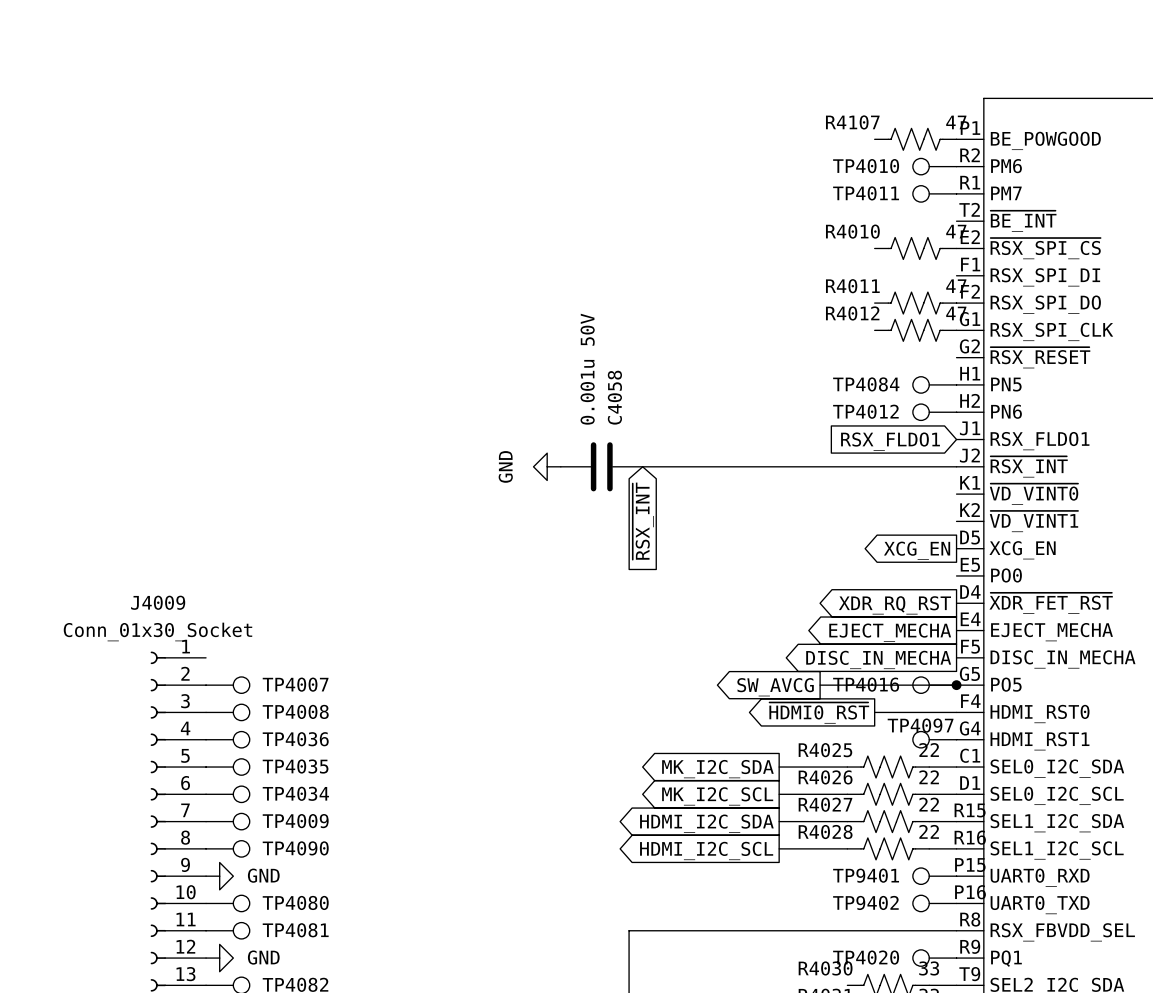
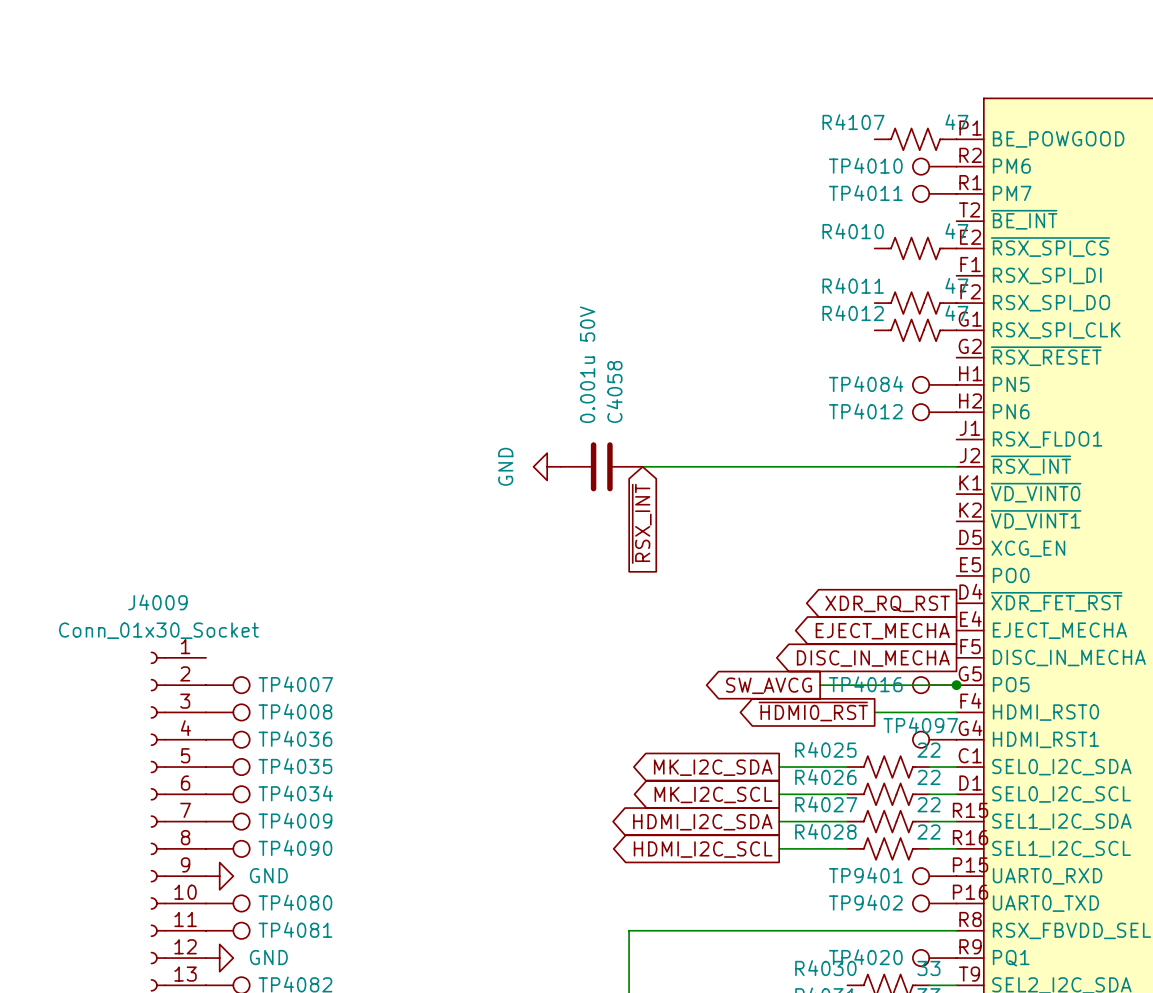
global label: RSX_FLDO1 (890, 441) -> none
global label: XCG_EN (917, 550) -> none

